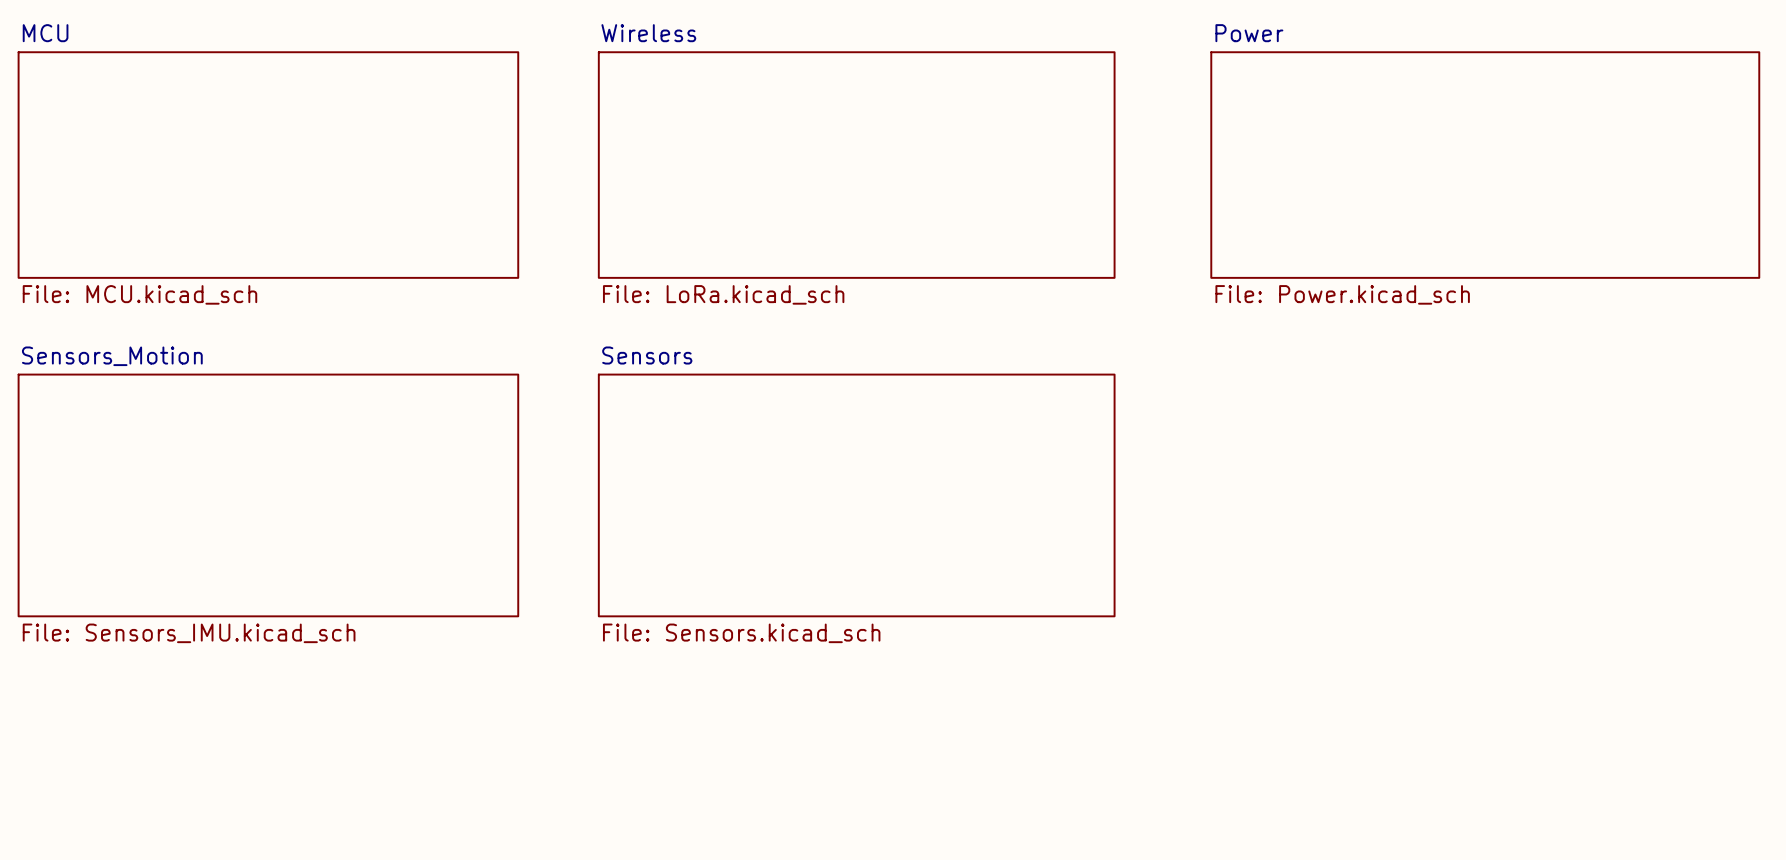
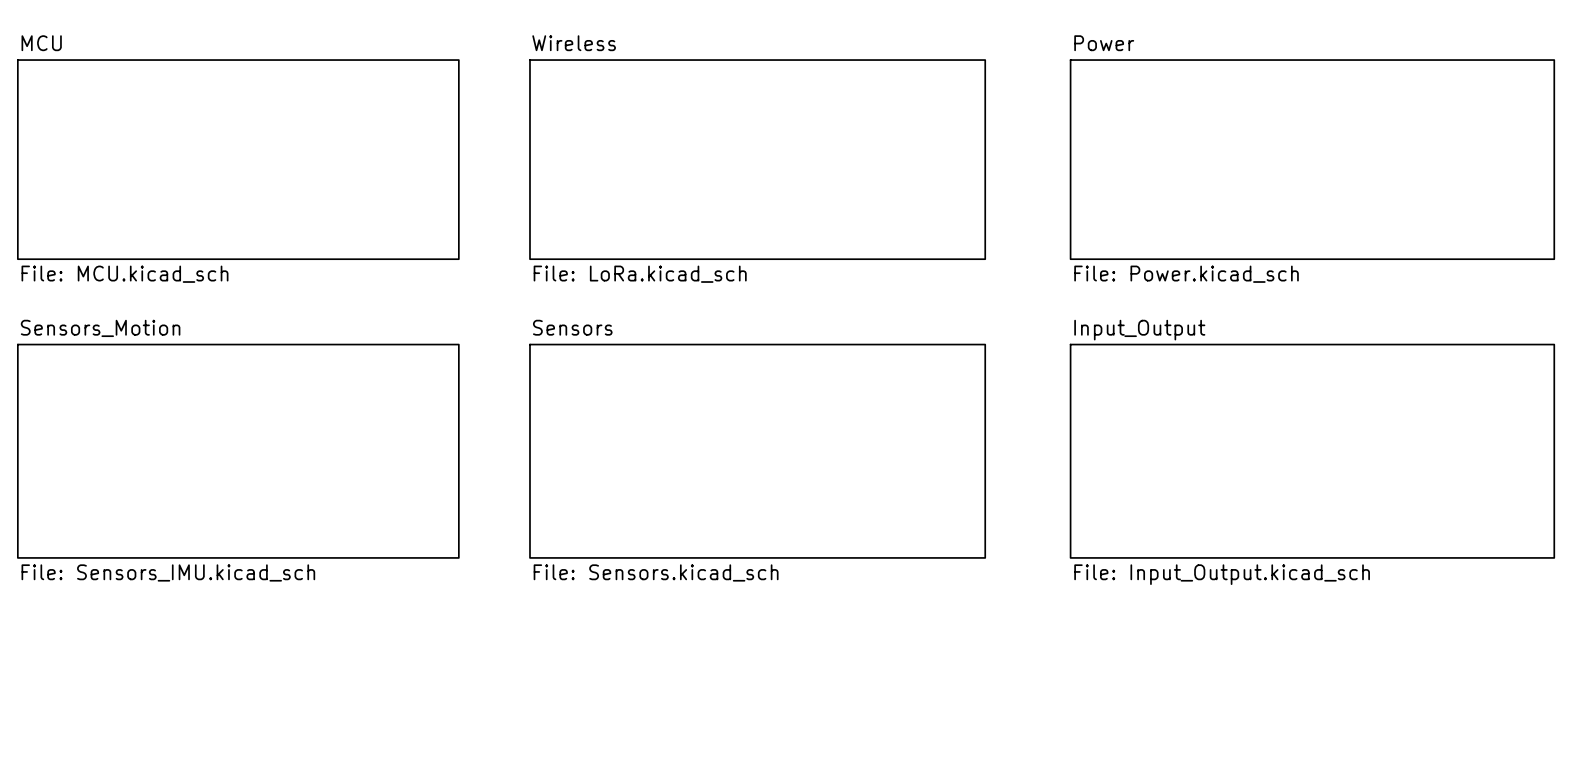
sheet Input_Output: none -> File: Input_Output.kicad_sch (1312, 451)

